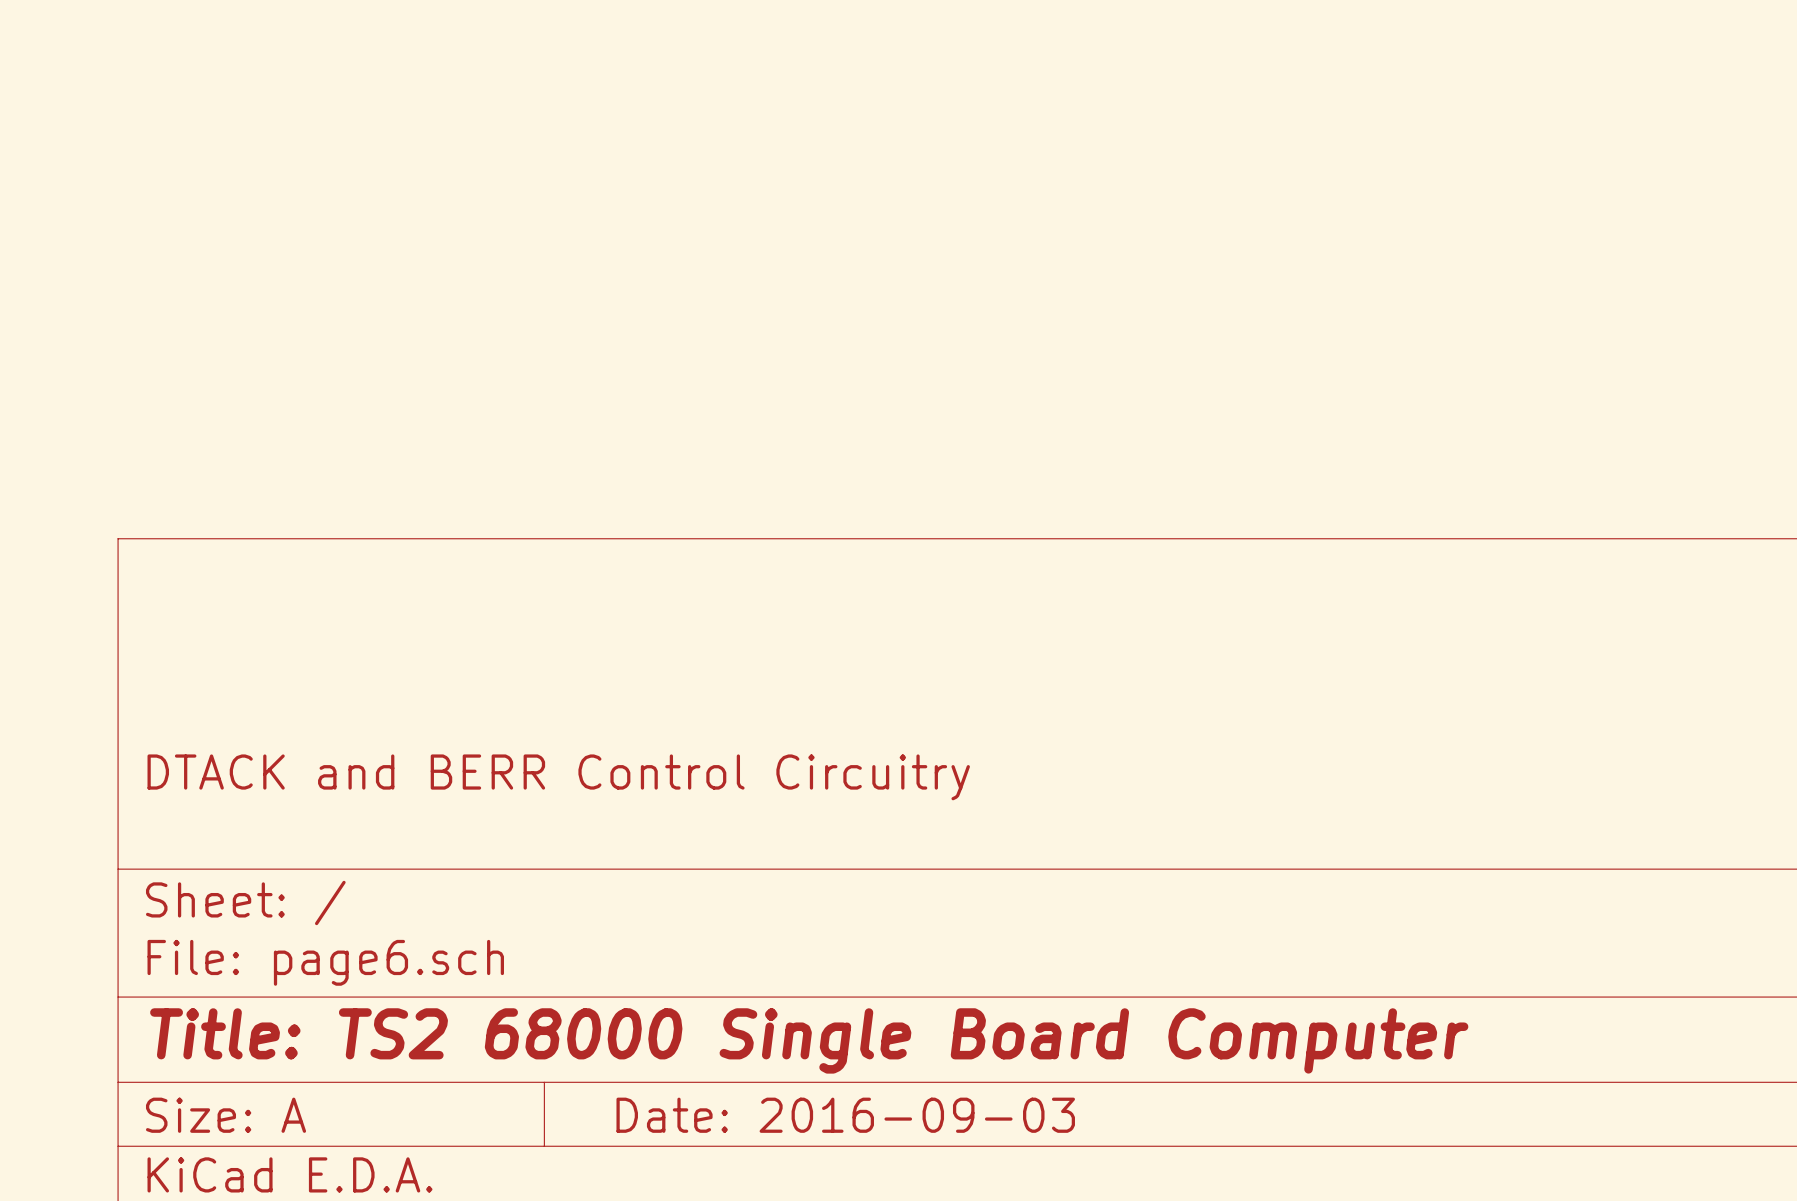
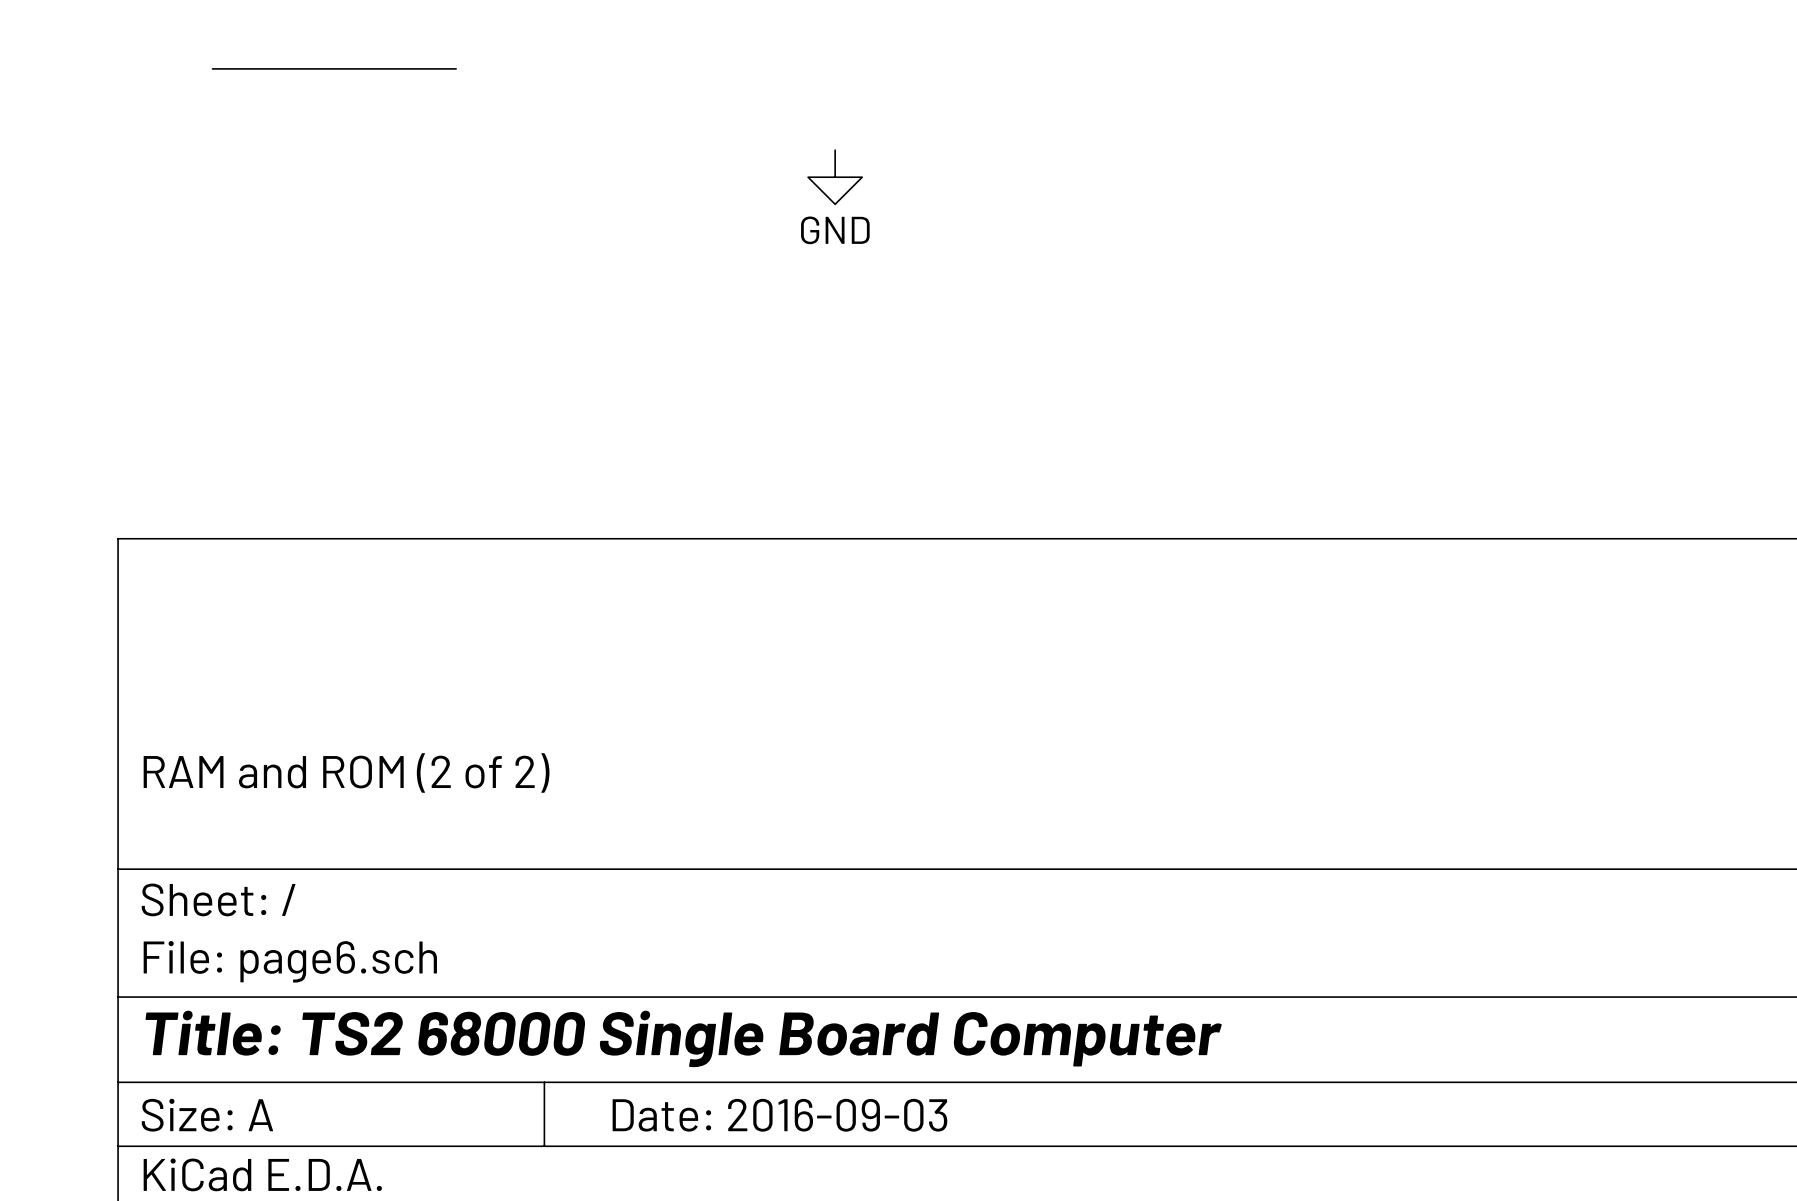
wire: none -> (212, 68) (456, 68)
power symbol: none -> GND (835, 177)
title block: DTACK and BERR Control Circuitry (558, 777) -> RAM and ROM (2 of 2) (346, 772)

